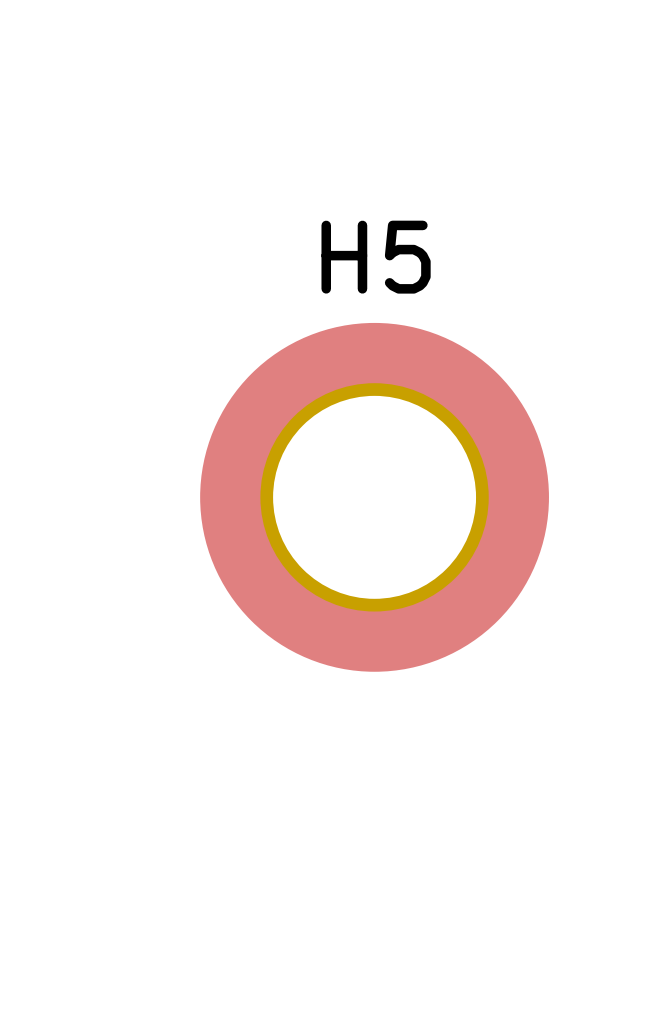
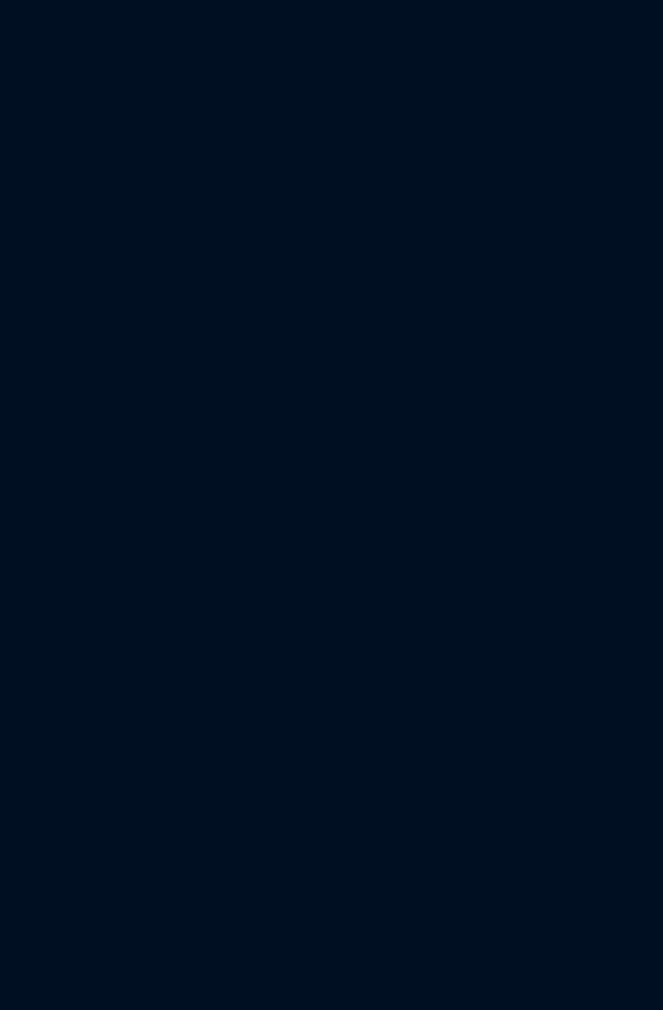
H5: (374, 497) -> none

